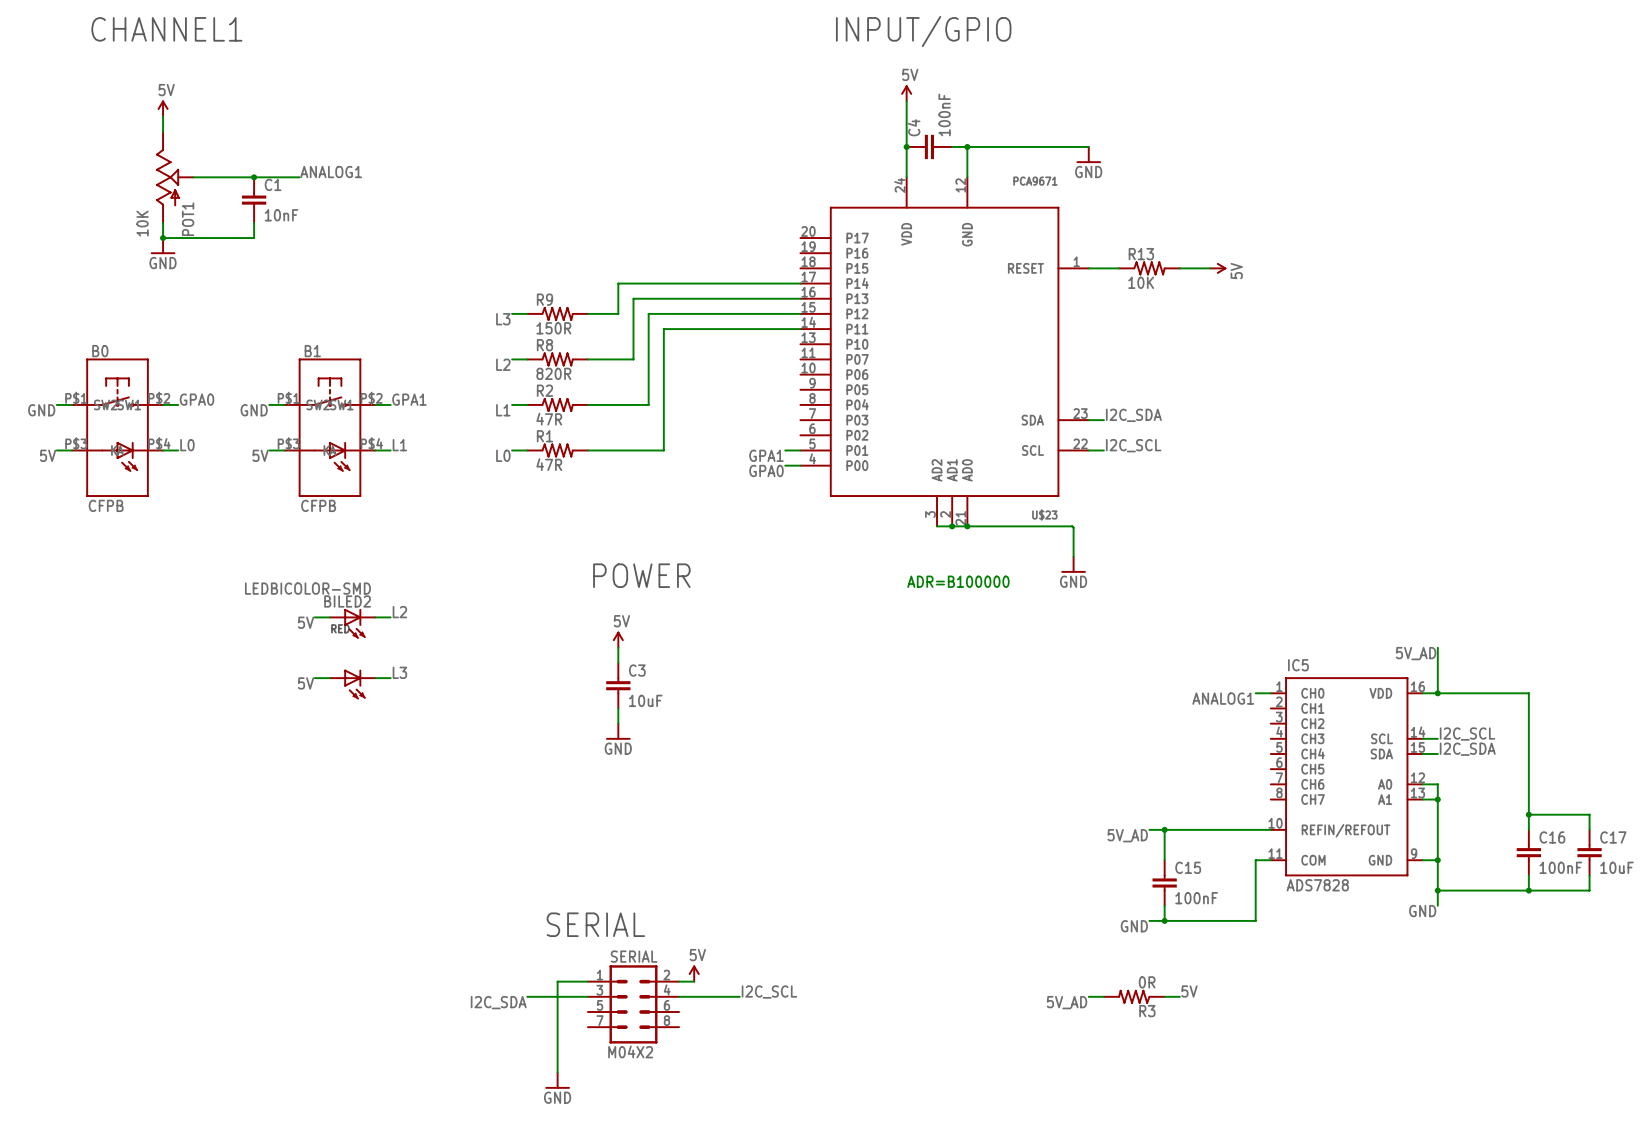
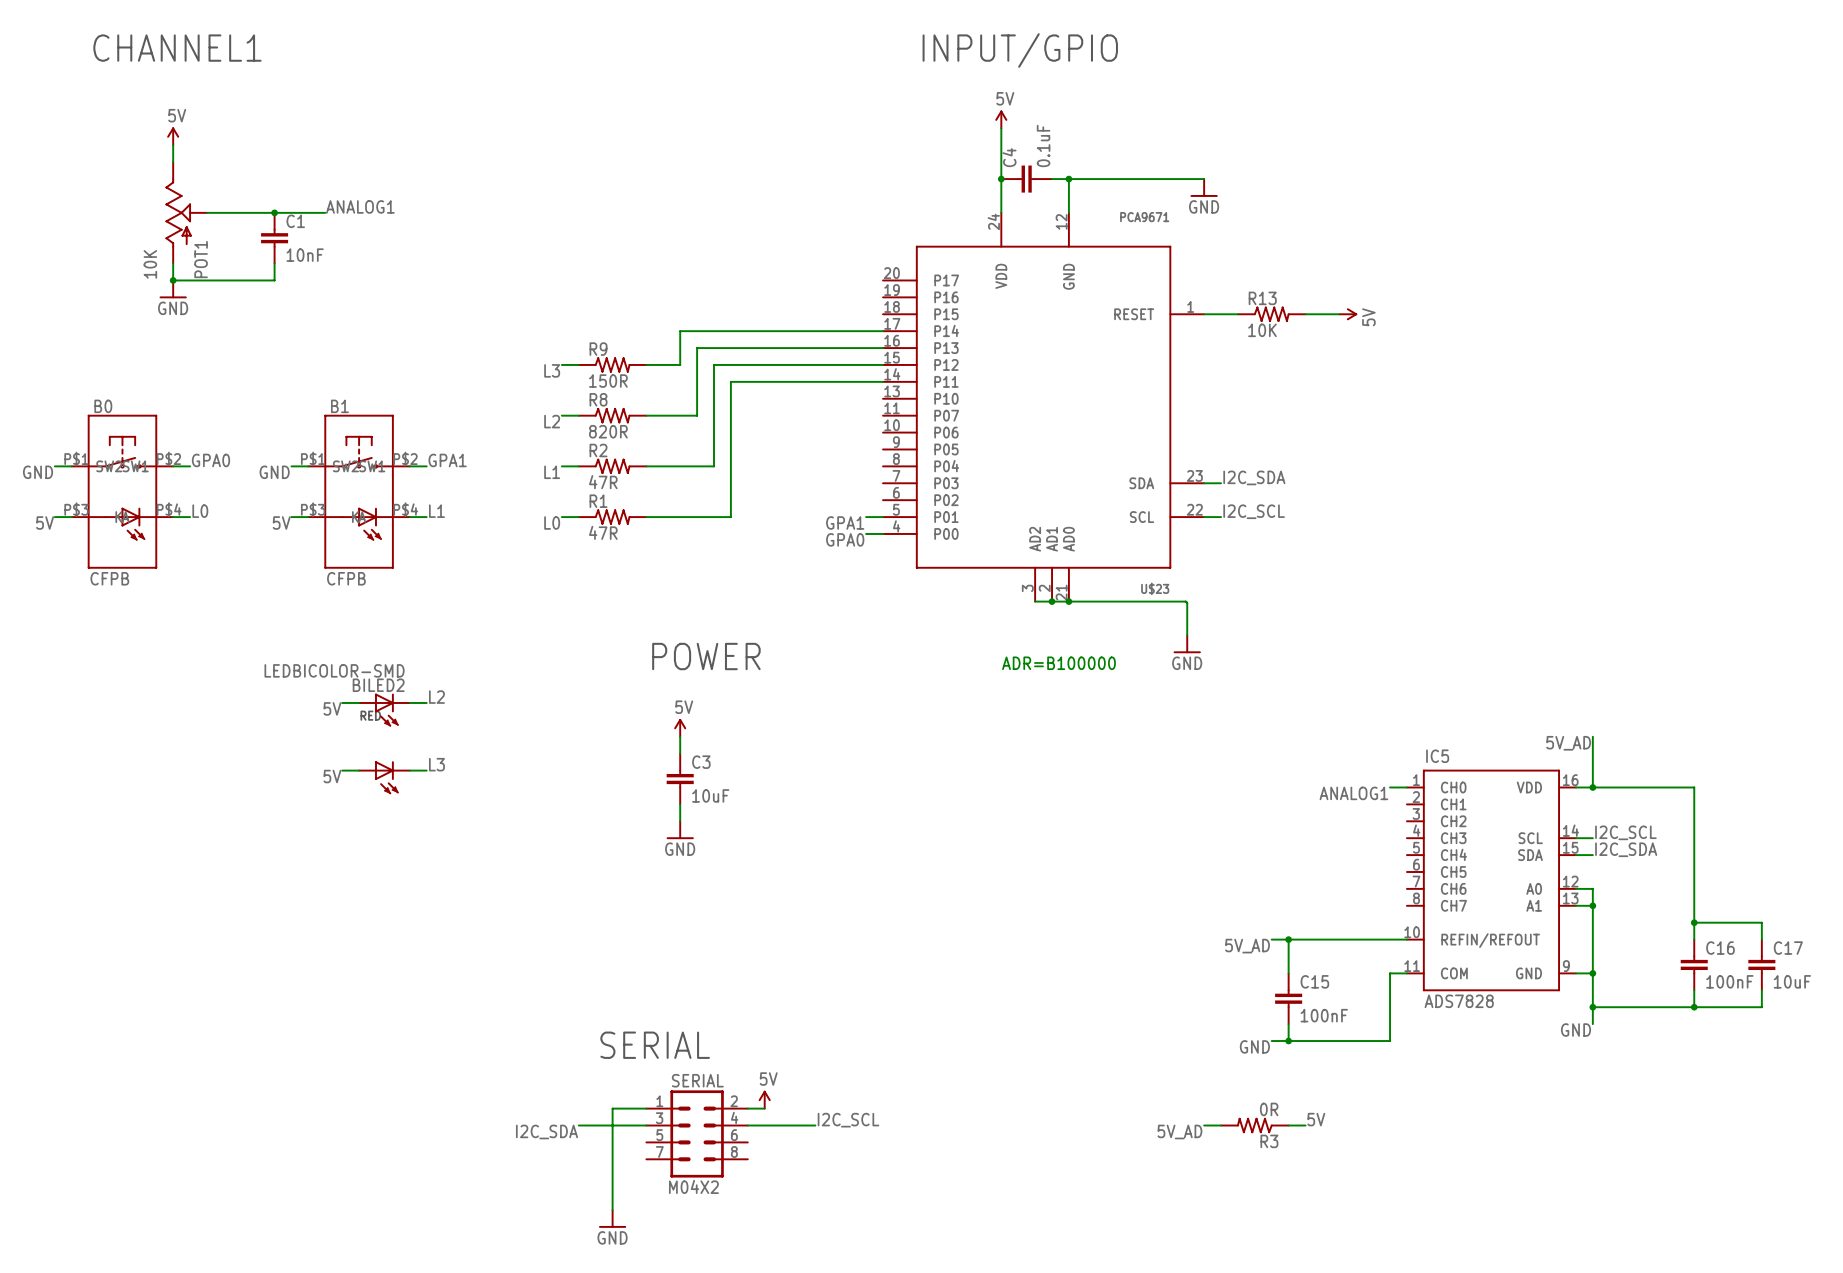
C4 value: 100nF (944, 115) -> 0.1uF (1043, 145)

